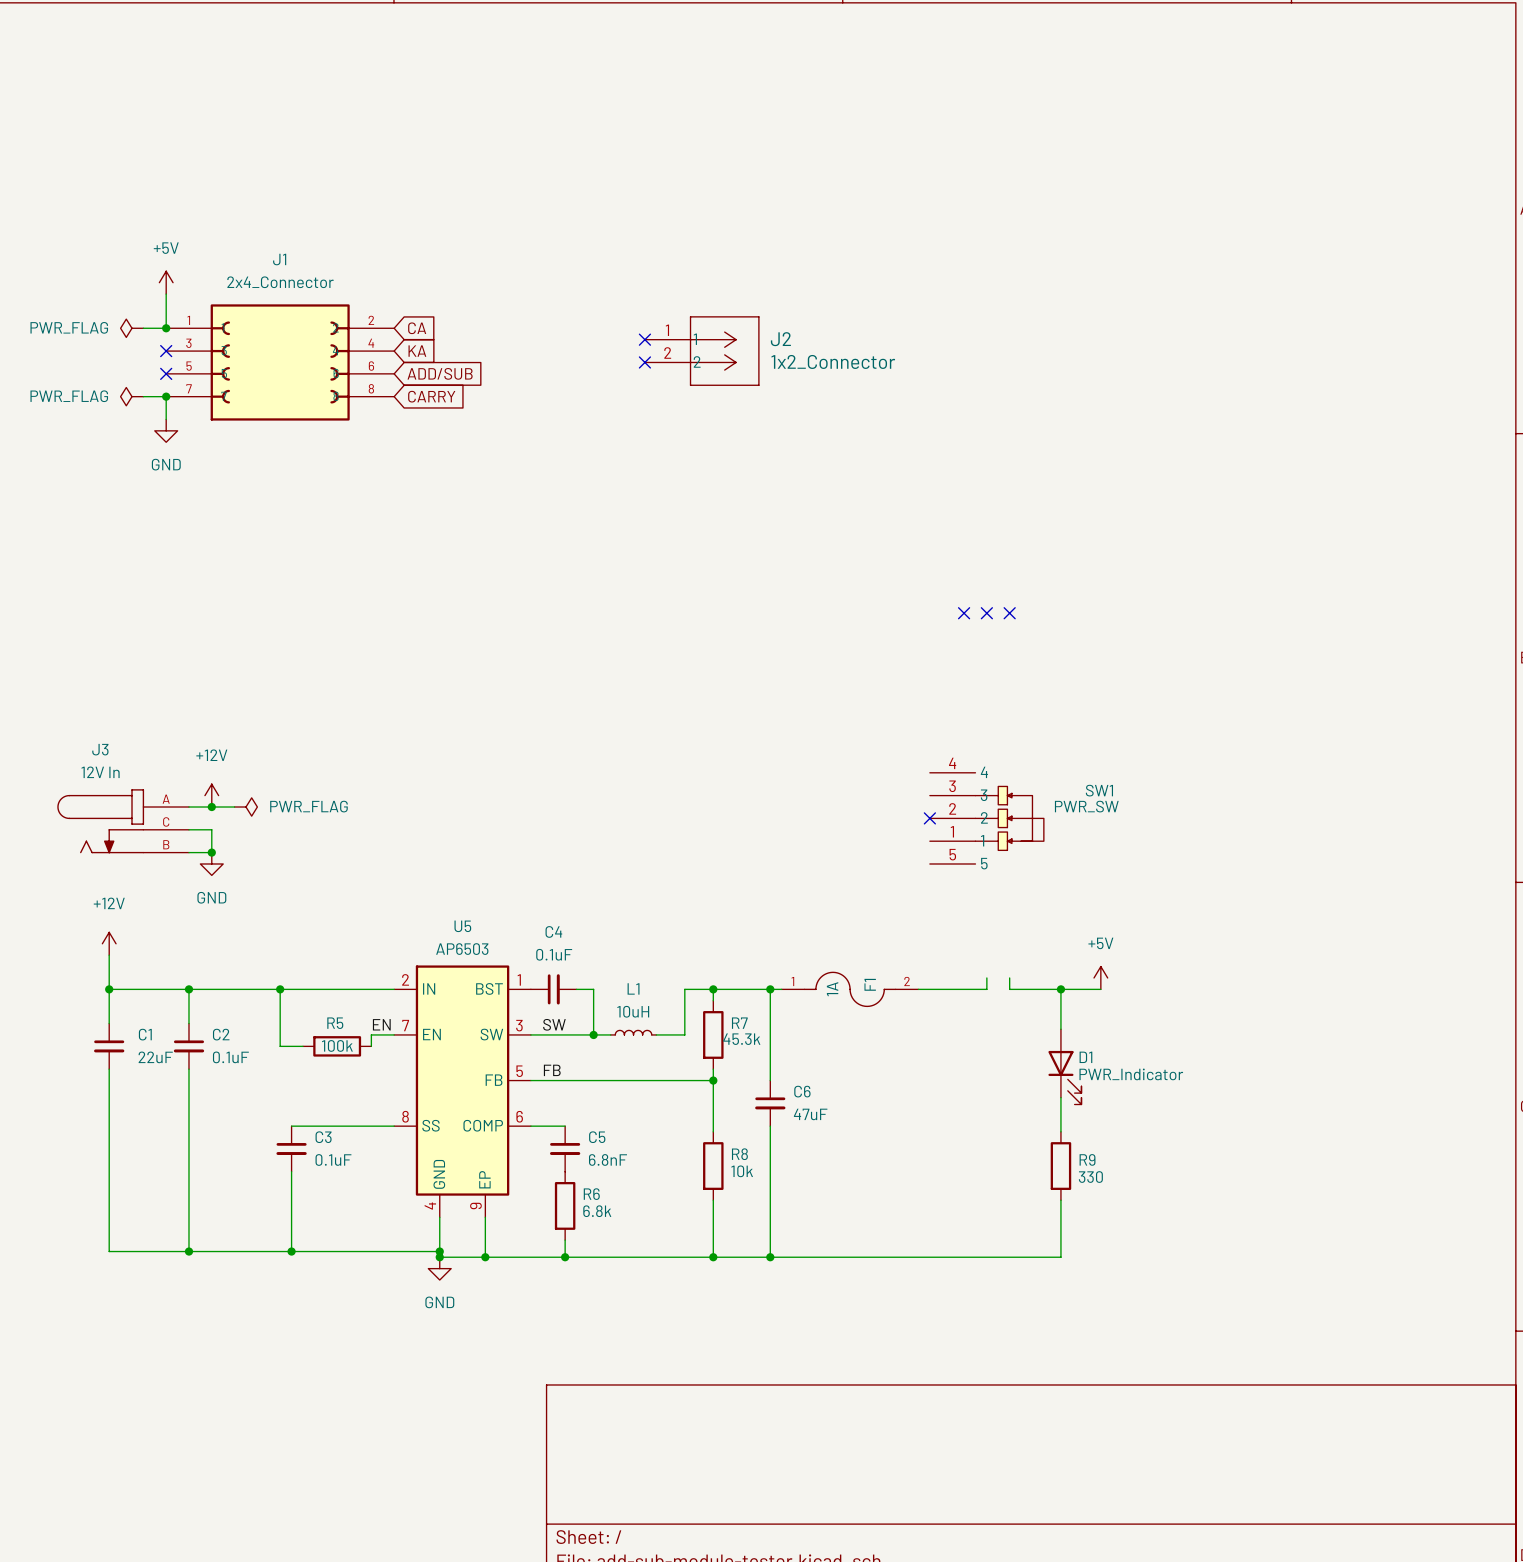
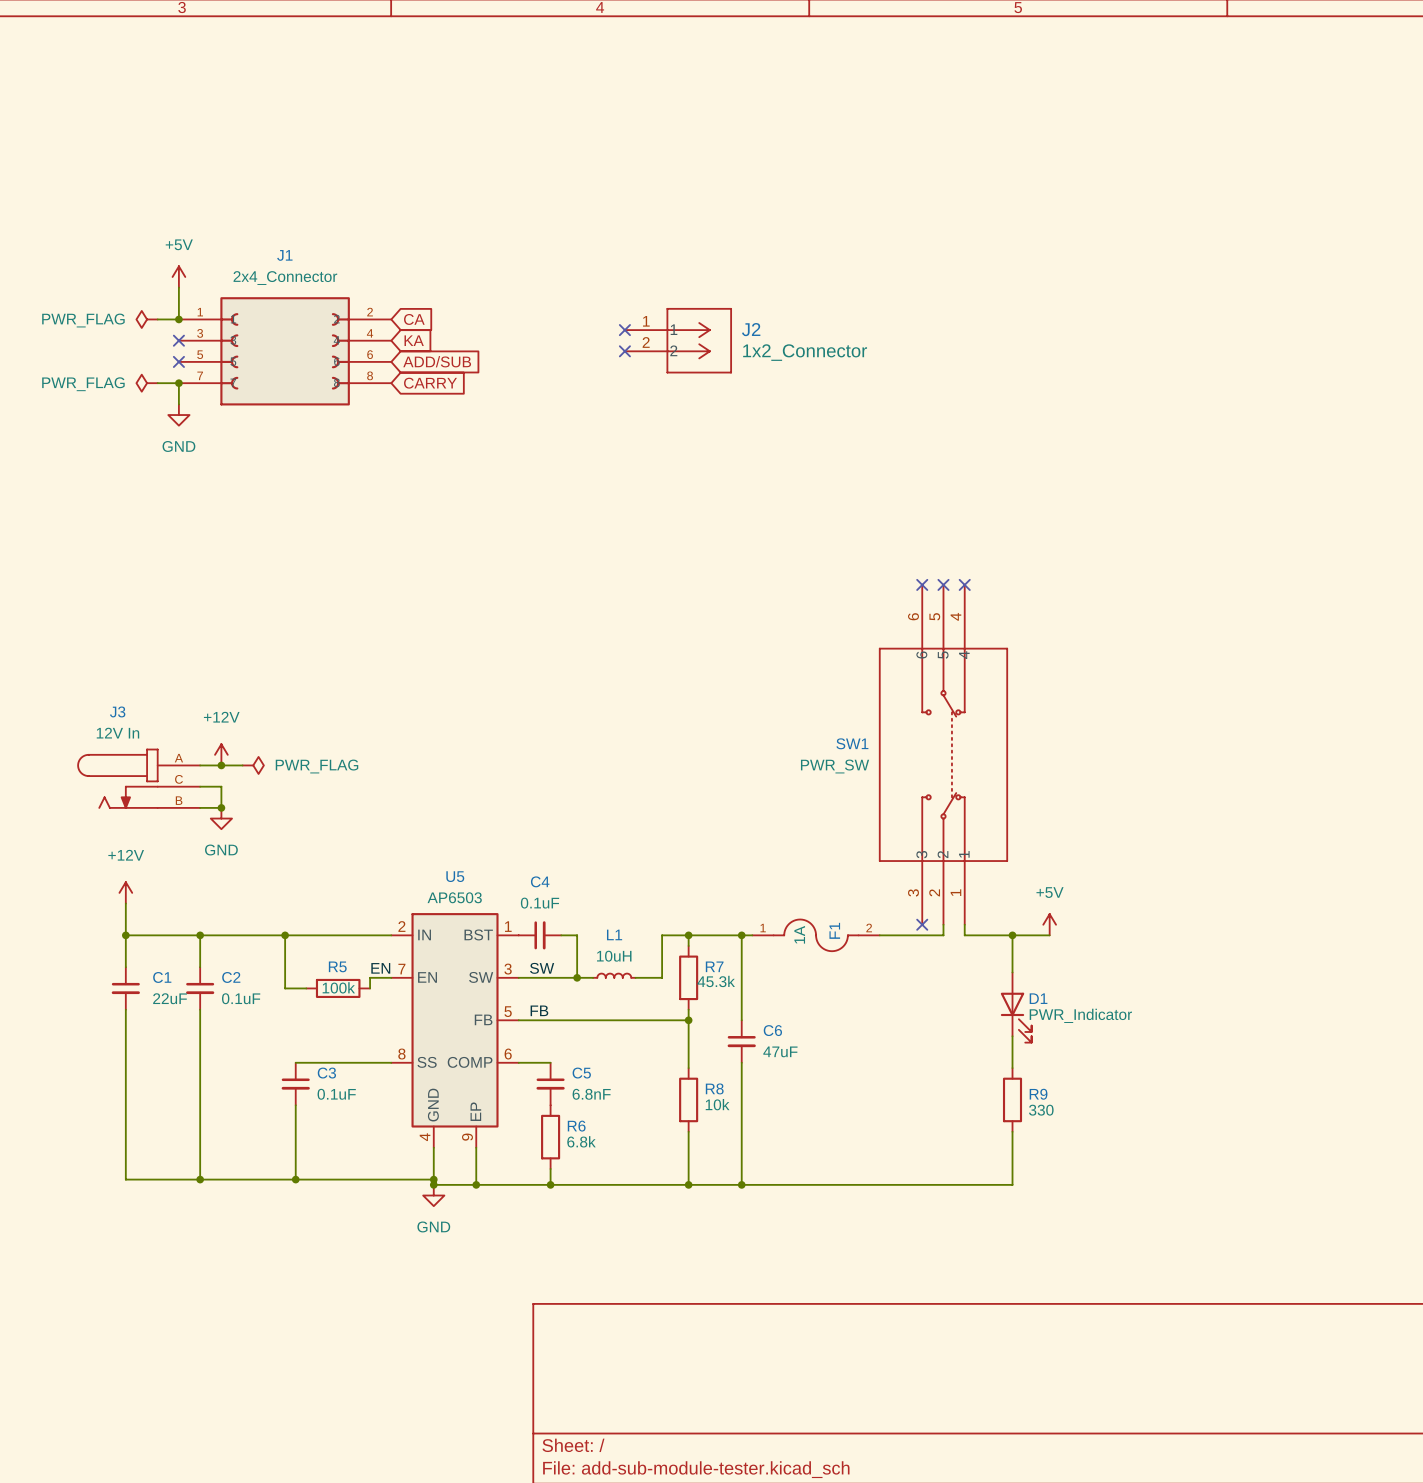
SW1 symbol: [929, 772, 1044, 864] -> [879, 584, 1008, 925]
SW1 name position: SW1 (1099, 790) -> SW1 (852, 743)
SW1 value position: PWR_SW (1086, 806) -> PWR_SW (835, 766)
no-connect mark: (929, 818) -> none
no-connect mark: none -> (922, 924)

